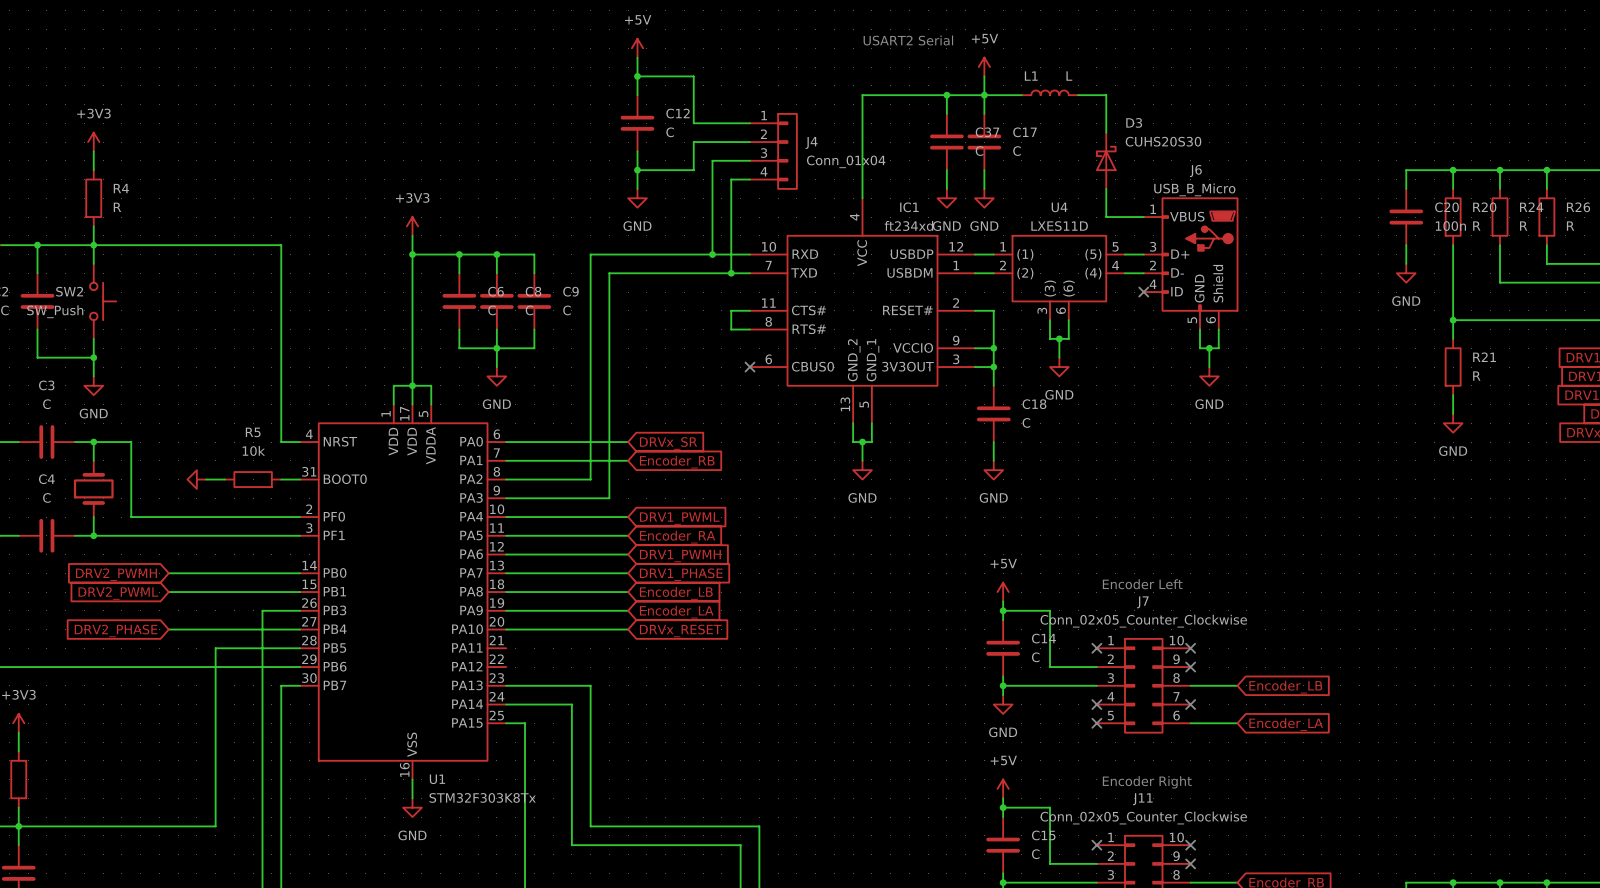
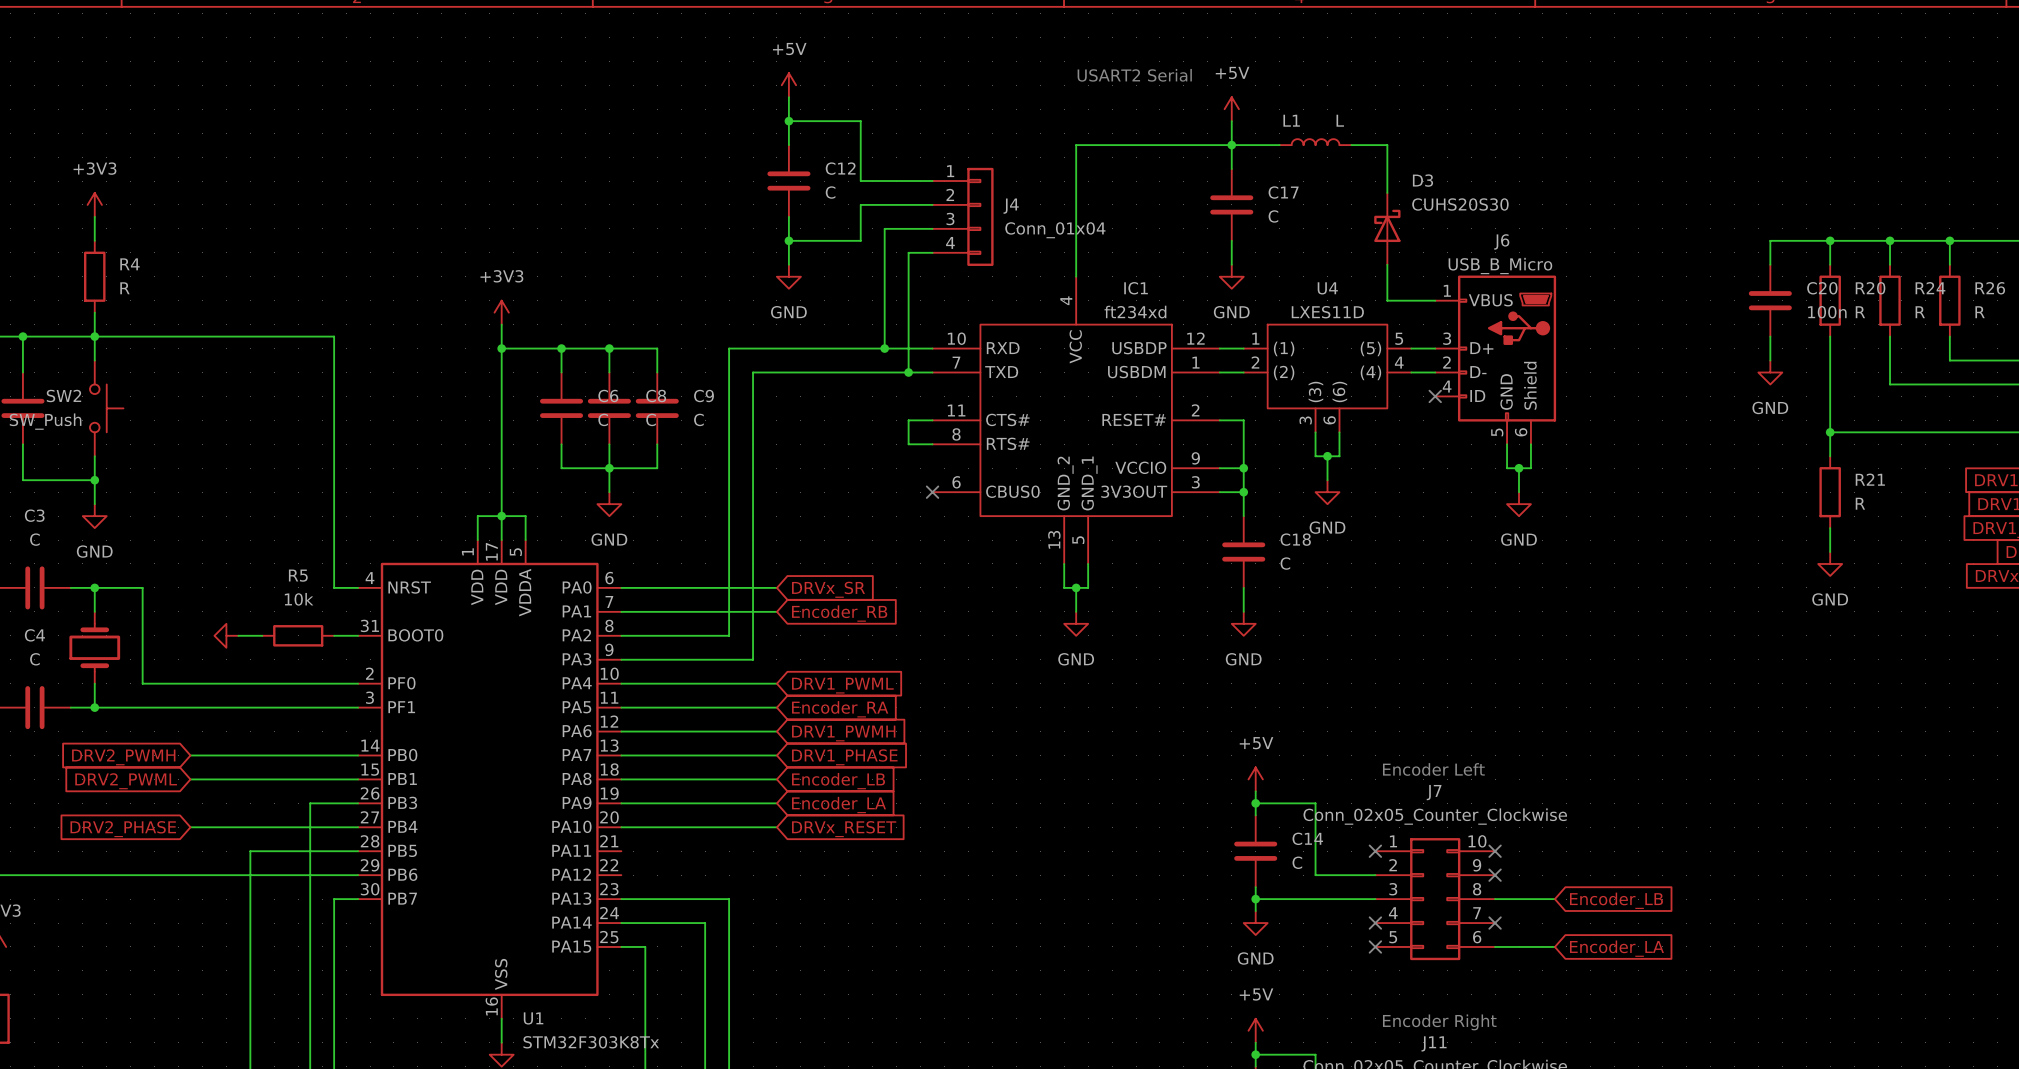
wire: (946, 95) (946, 113) -> none
junction: (946, 95) -> none
C37: C (946, 142) -> none
wire: (946, 170) (946, 188) -> none
power symbol: GND (946, 198) -> none

